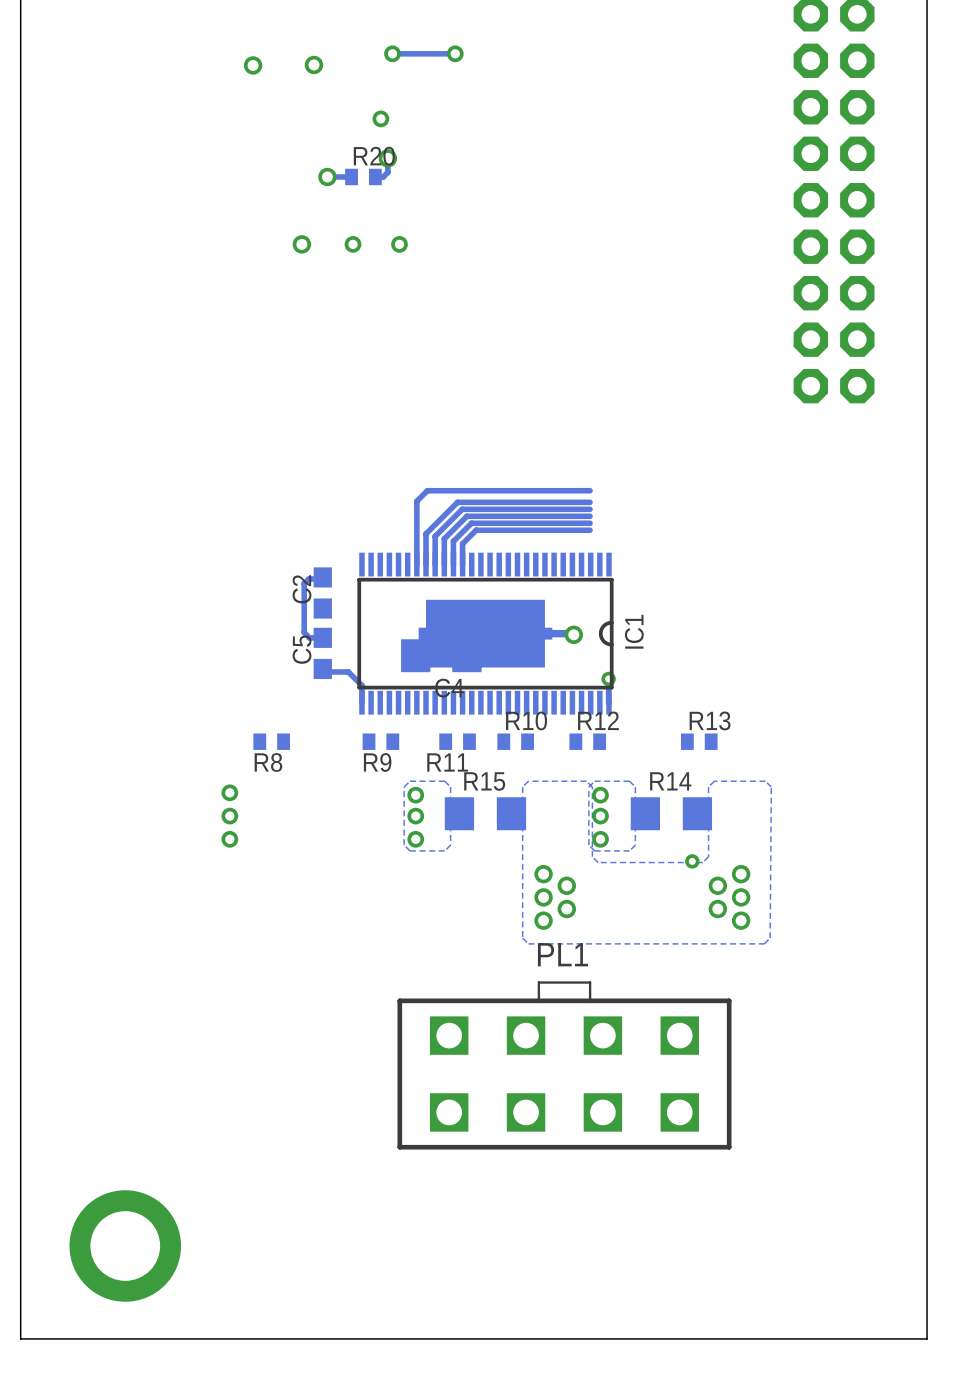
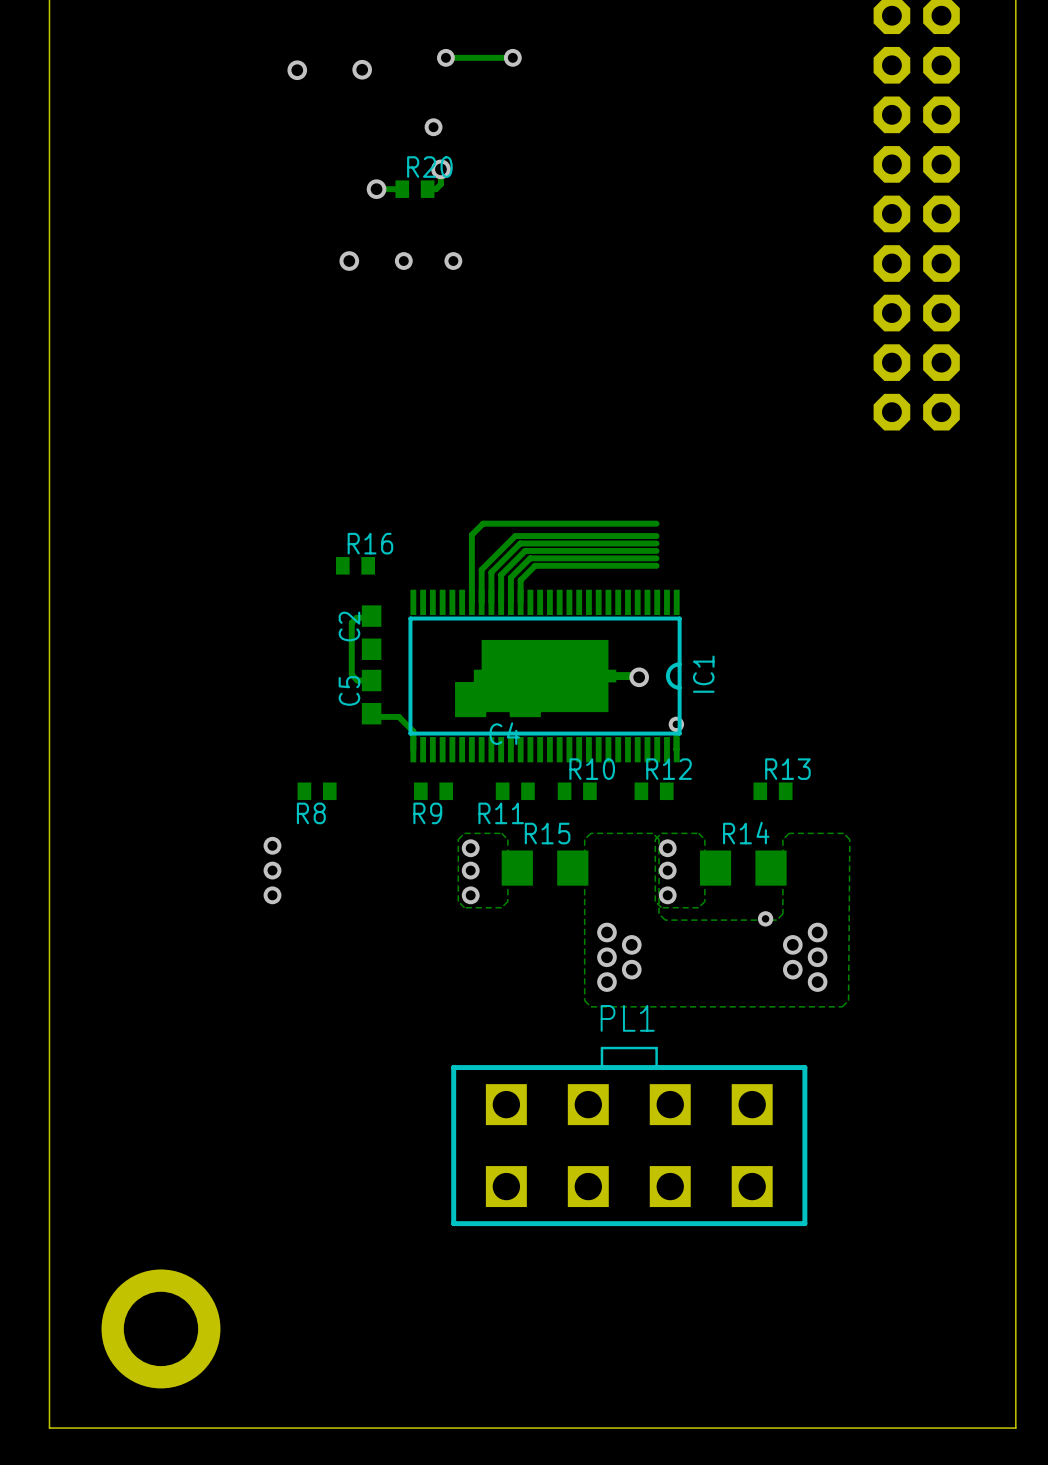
R16: none -> (355, 565)

